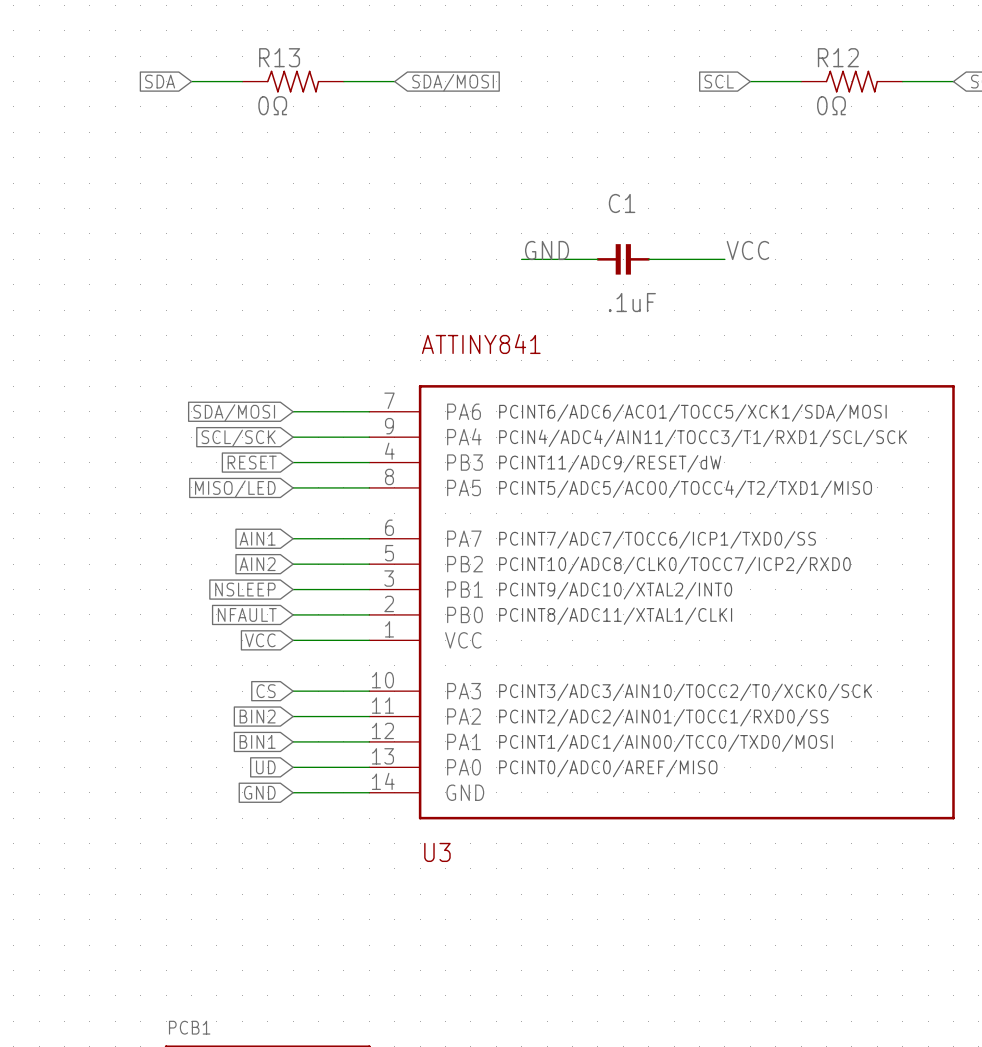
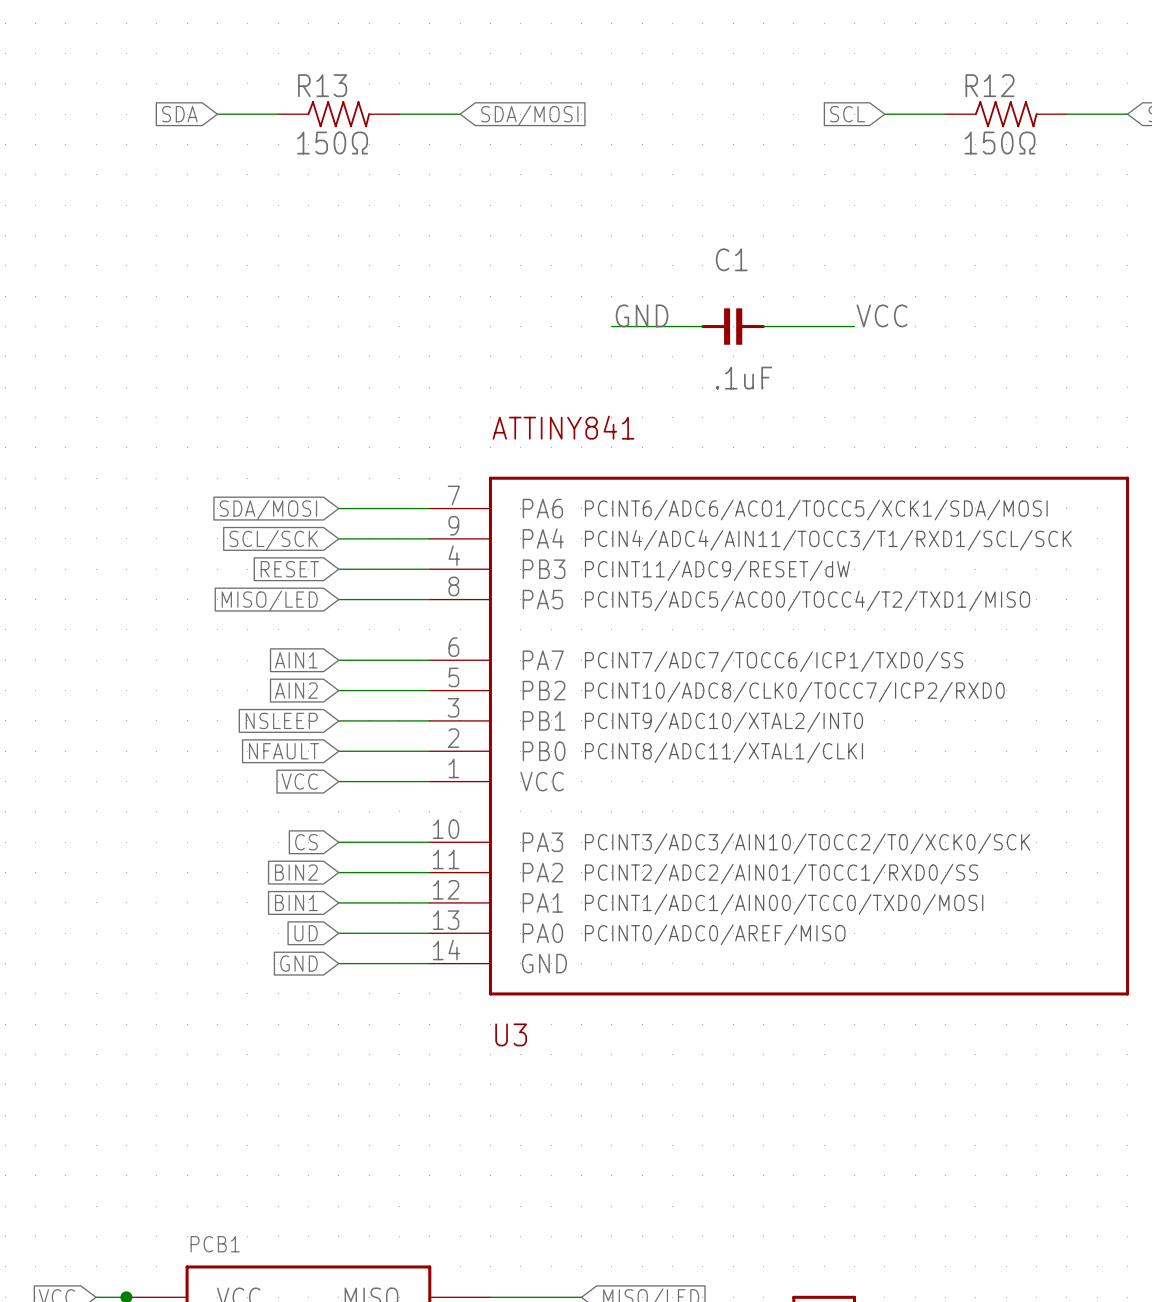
R13 value: 0Ω (272, 105) -> 150Ω (332, 143)
R12 value: 0Ω (831, 105) -> 150Ω (1000, 143)

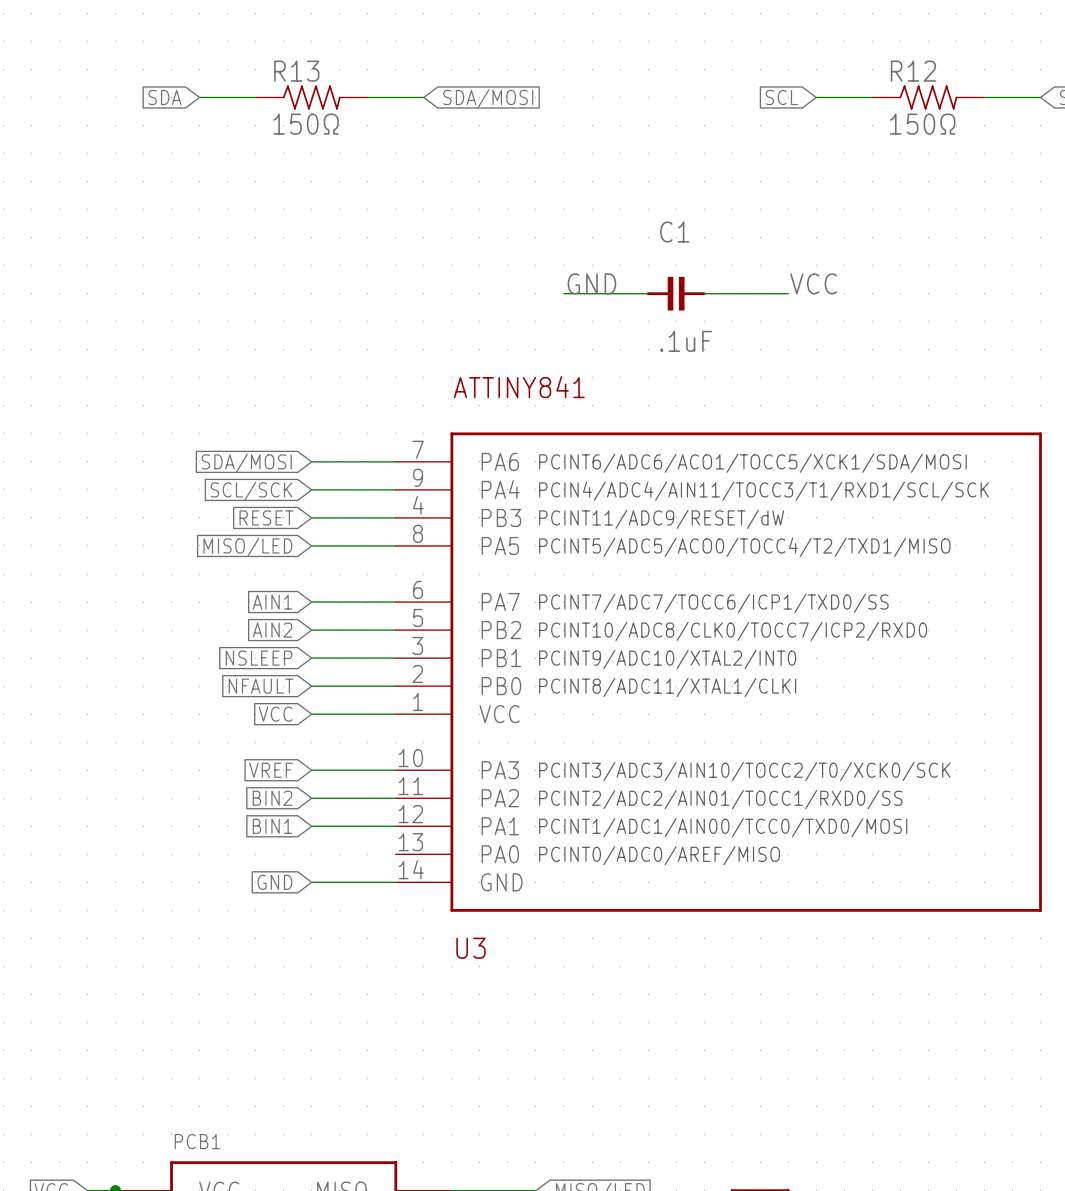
global label: CS (306, 842) -> VREF (271, 770)
global label: UD (306, 933) -> none
wire: (338, 933) (429, 933) -> none

